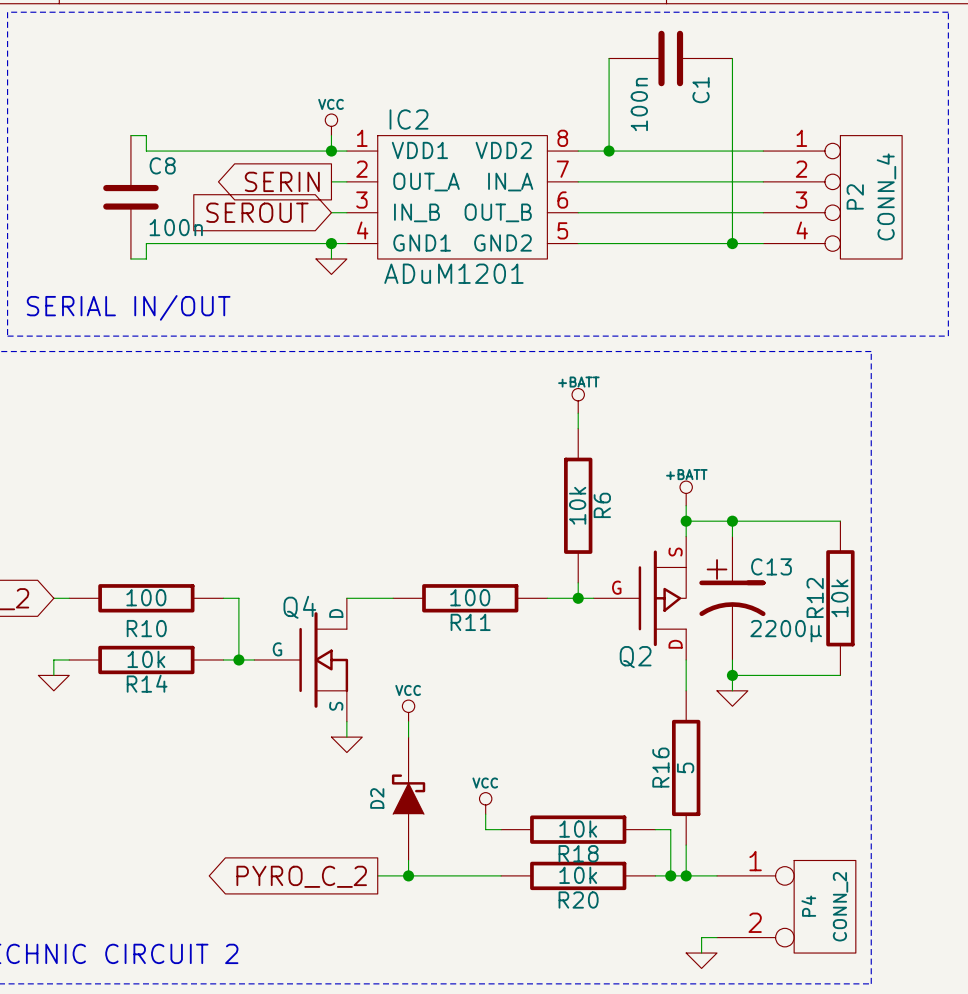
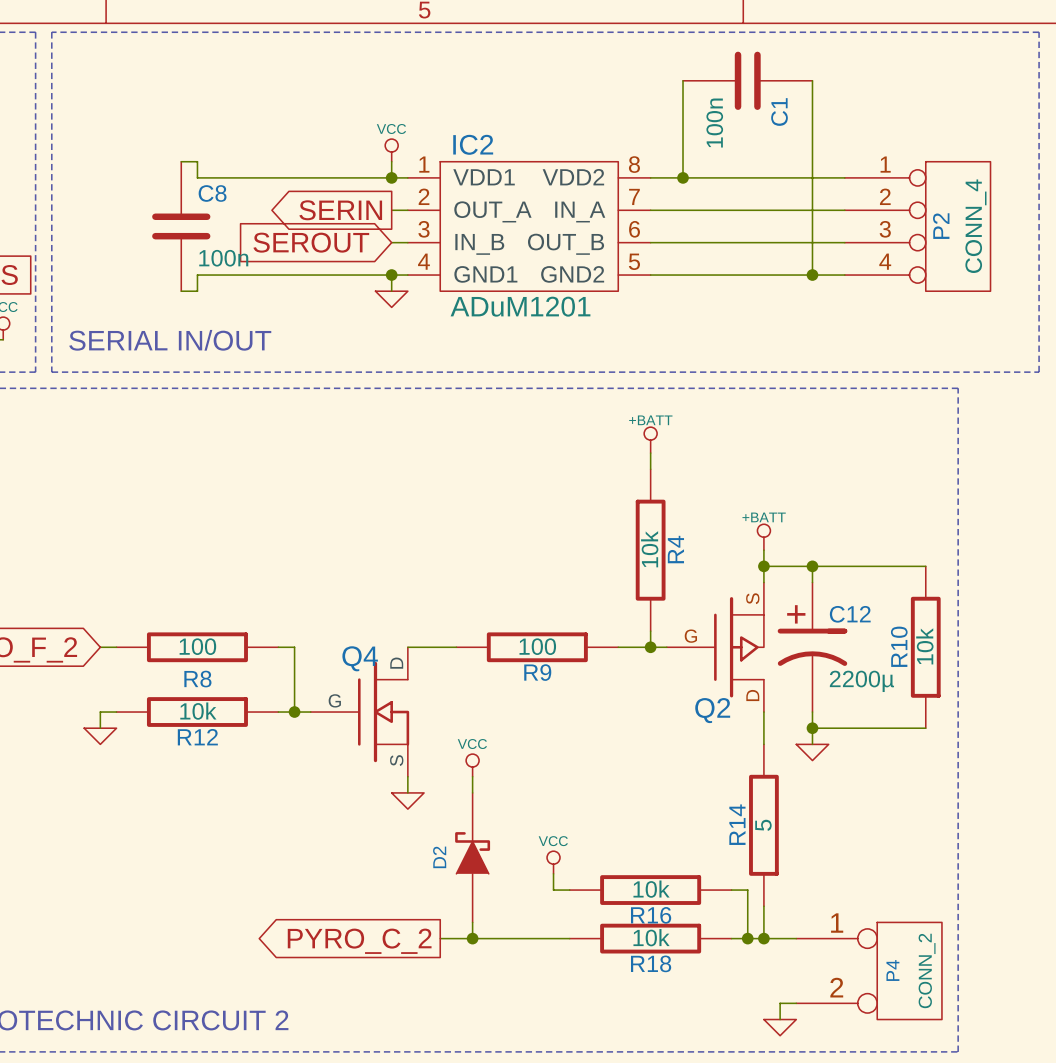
R6 name: R6 (602, 505) -> R4 (675, 549)
C13 name: C13 (771, 566) -> C12 (850, 614)
R12 name: R12 (815, 597) -> R10 (899, 646)
R11 name: R11 (470, 622) -> R9 (537, 672)
R10 name: R10 (146, 628) -> R8 (197, 679)
R14 name: R14 (147, 683) -> R12 (197, 737)
R16 name: R16 (660, 767) -> R14 (737, 824)
R18 name: R18 (578, 853) -> R16 (651, 915)
R20 name: R20 (578, 900) -> R18 (651, 963)

